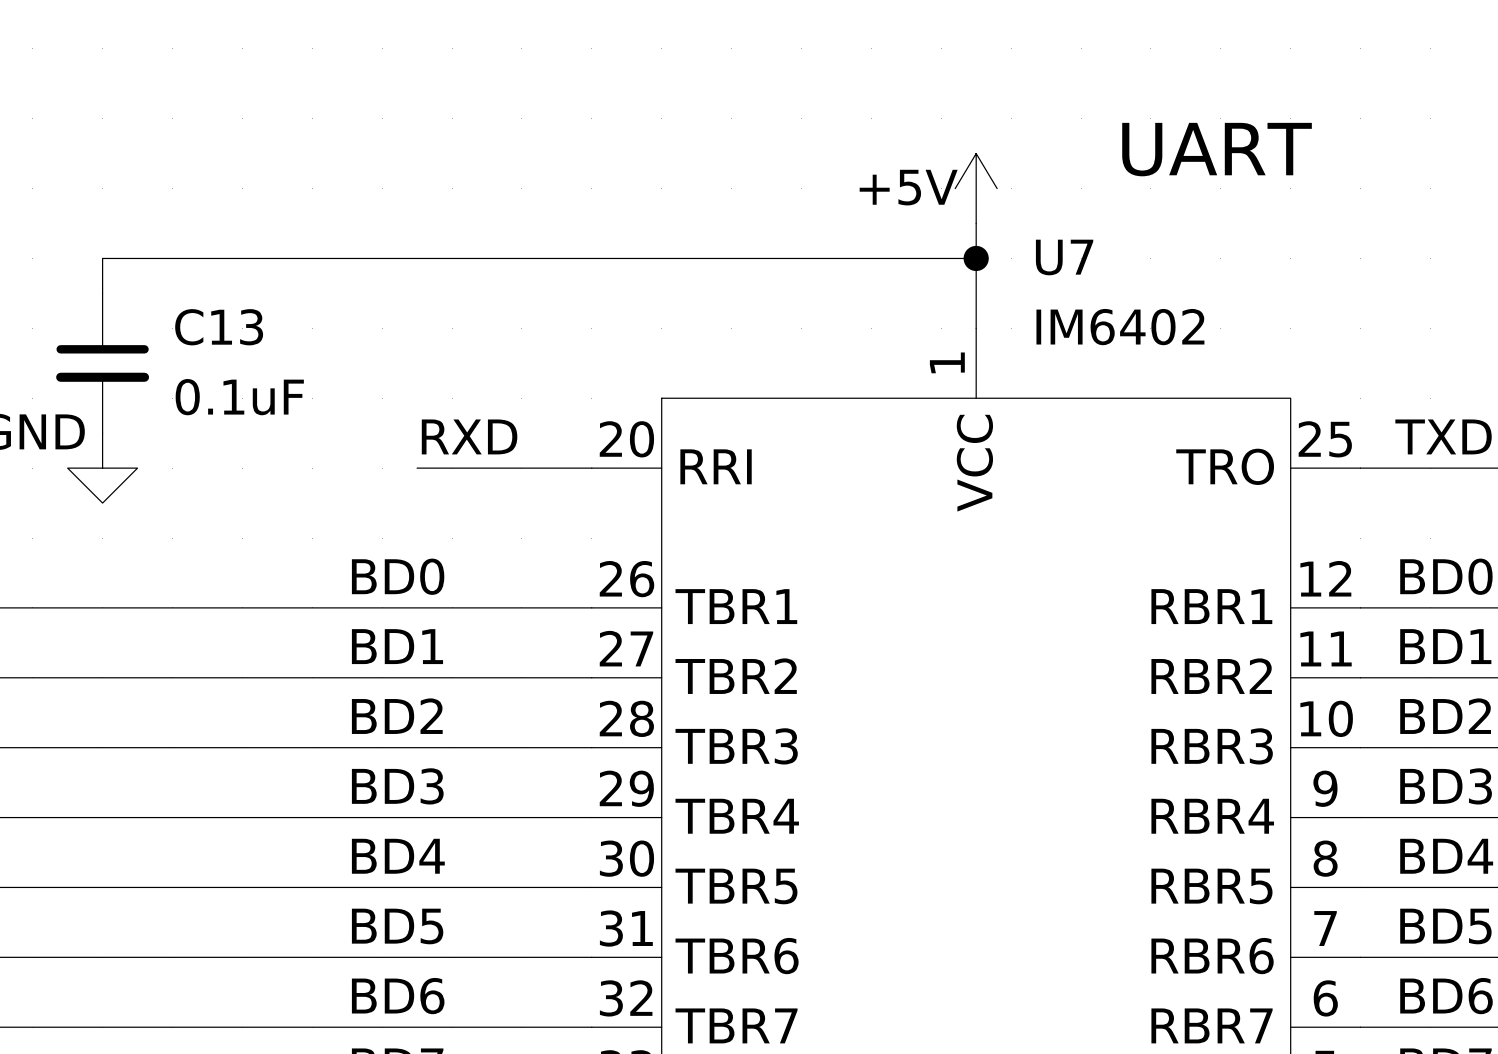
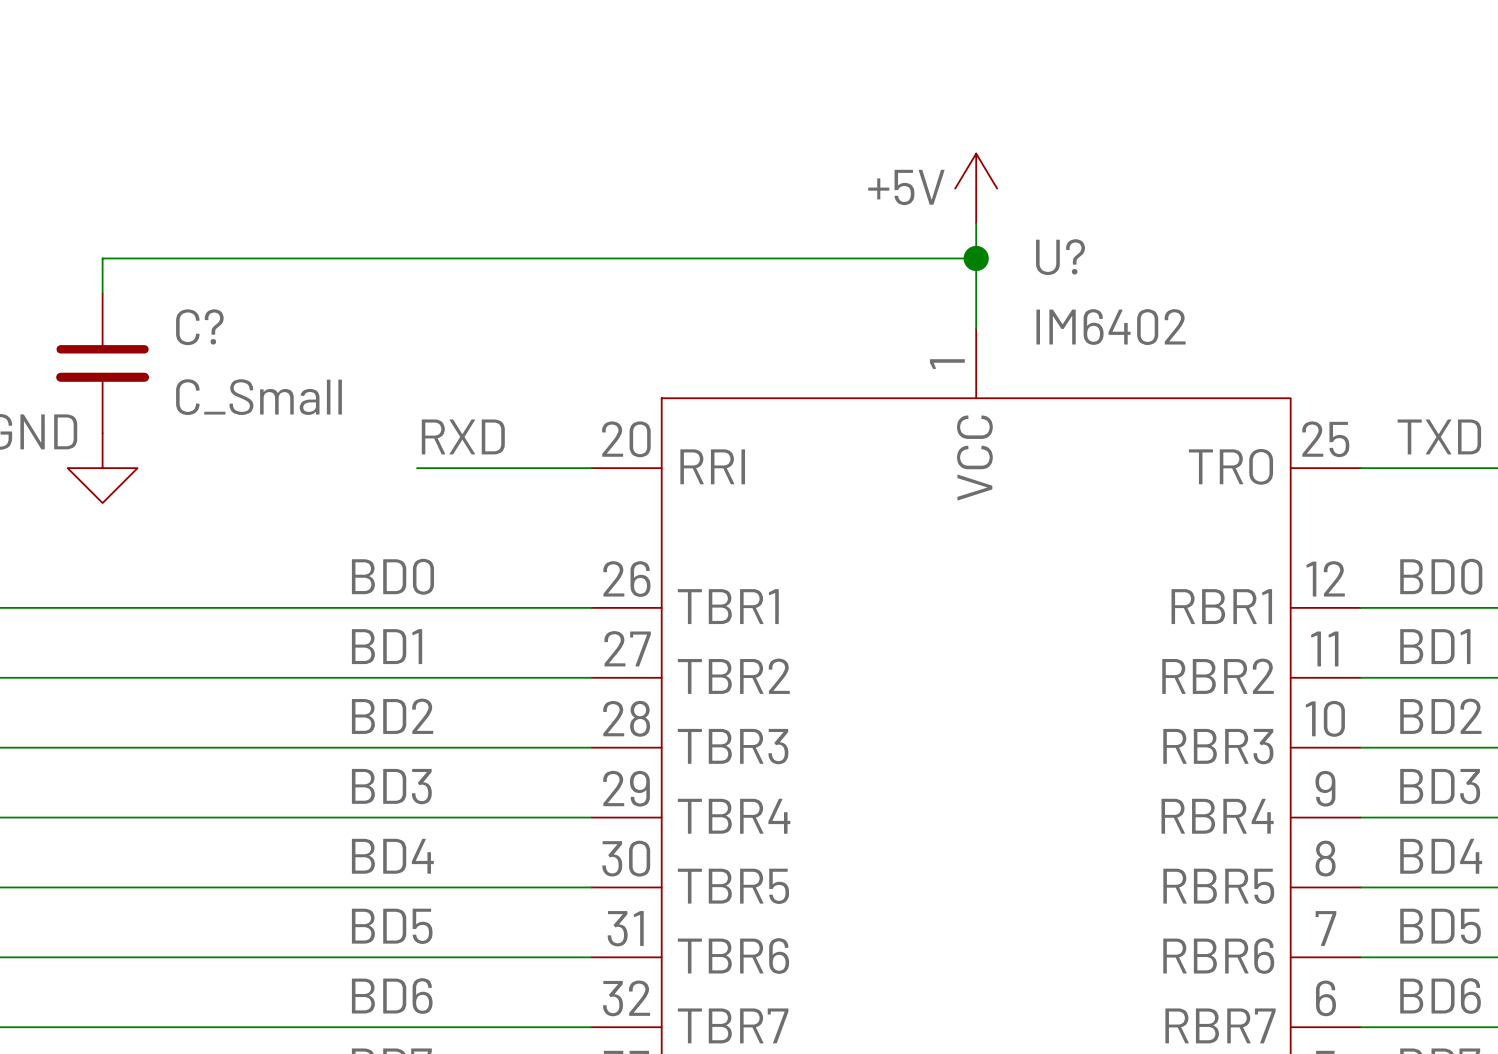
text: UART (1217, 149) -> none
U7 name: U7 (1064, 257) -> U? (1060, 257)
C13 name: C13 (219, 327) -> C? (199, 327)
C13 value: 0.1uF (239, 397) -> C_Small (259, 397)

